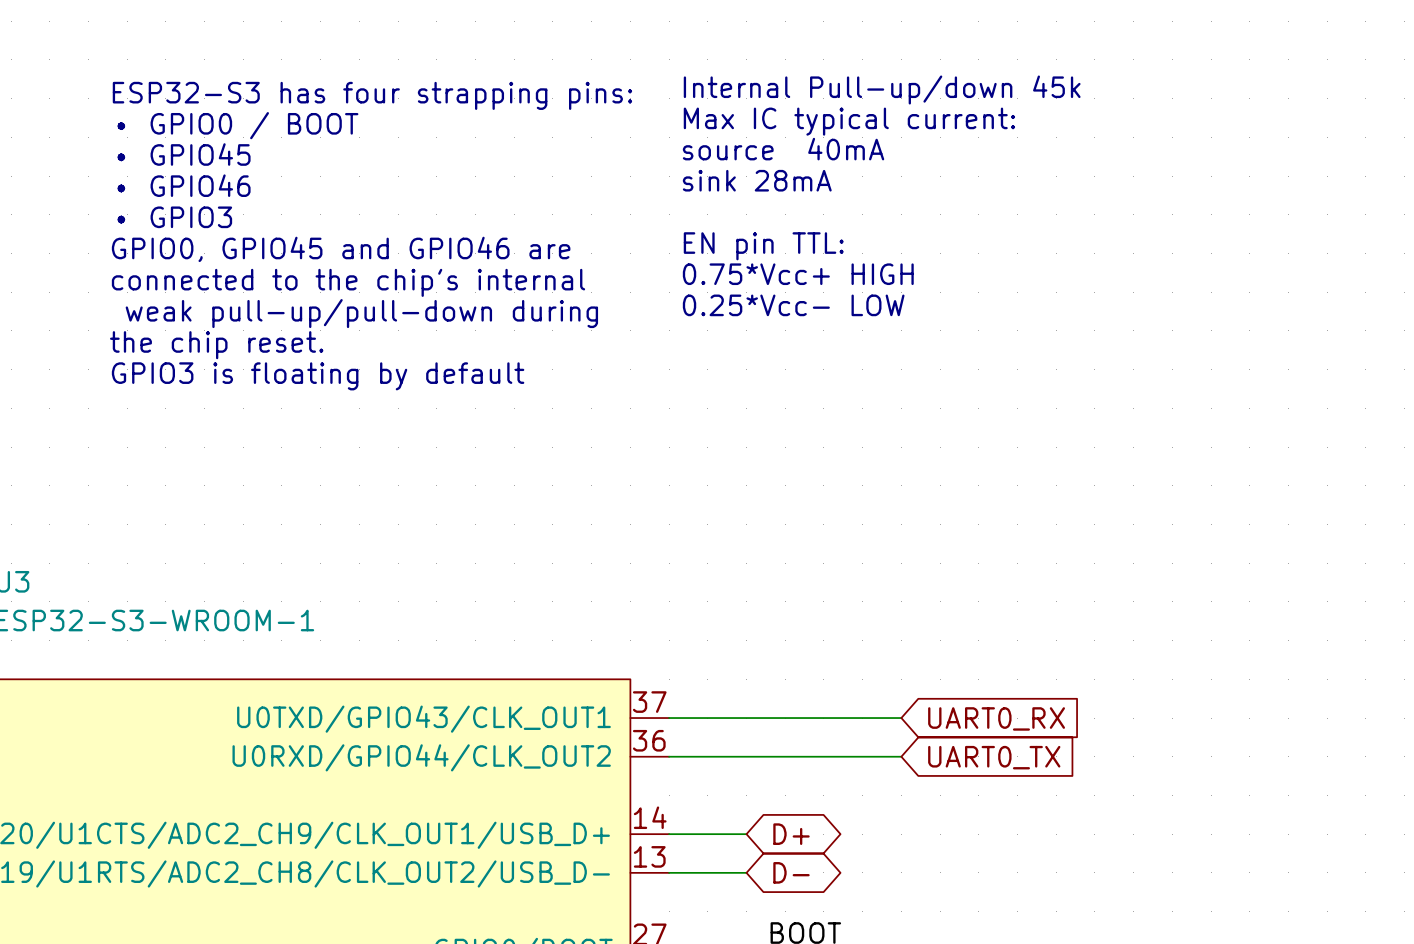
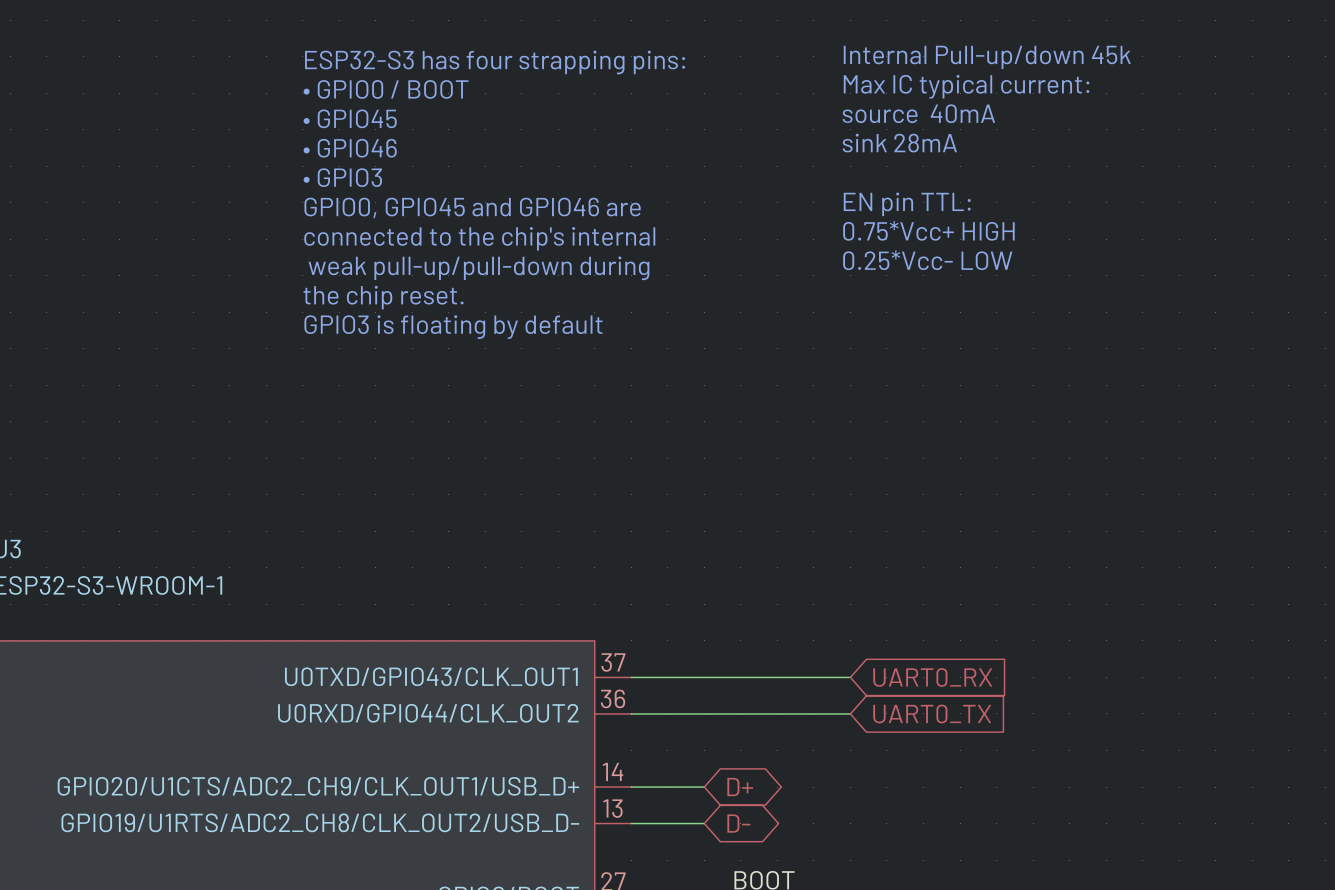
text position: Internal Pull-up/down 45k (882, 90) -> Internal Pull-up/down 45k (987, 57)
text position: ESP32-S3 has four strapping pins: (372, 95) -> ESP32-S3 has four strapping pins: (495, 62)
text position: Max IC typical current: (849, 121) -> Max IC typical current: (966, 86)
text position: • GPIO0 / BOOT (237, 125) -> • GPIO0 / BOOT (386, 89)
text position: source 40mA (783, 149) -> source 40mA (918, 113)
text position: • GPIO45 (183, 154) -> • GPIO45 (350, 118)
text position: sink 28mA (757, 180) -> sink 28mA (899, 143)
text position: • GPIO46 (183, 185) -> • GPIO46 (350, 148)
text position: • GPIO3 (174, 217) -> • GPIO3 (342, 177)
text position: EN pin TTL: (763, 246) -> EN pin TTL: (907, 204)
text position: GPIO0, GPIO45 and GPIO46 are (341, 249) -> GPIO0, GPIO45 and GPIO46 are (472, 207)
text position: 0.75*Vcc+ HIGH (798, 274) -> 0.75*Vcc+ HIGH (928, 230)
text position: connected to the chip's internal (348, 282) -> connected to the chip's internal (479, 238)
text position: 0.25*Vcc- LOW (793, 305) -> 0.25*Vcc- LOW (927, 260)
text position: weak pull-up/pull-down during (361, 313) -> weak pull-up/pull-down during (478, 268)
text position: the chip reset. (216, 345) -> the chip reset. (383, 297)
text position: GPIO3 is floating by default (318, 376) -> GPIO3 is floating by default (453, 327)

